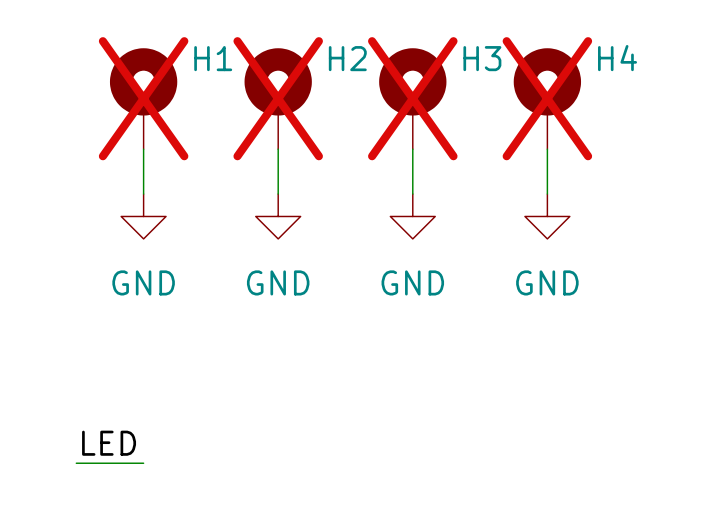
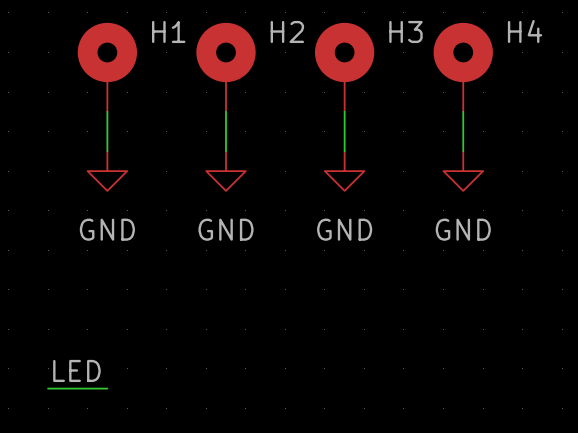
H1 do-not-place cross: (143, 98) -> none
H2 do-not-place cross: (278, 98) -> none
H3 do-not-place cross: (412, 98) -> none
H4 do-not-place cross: (547, 98) -> none

